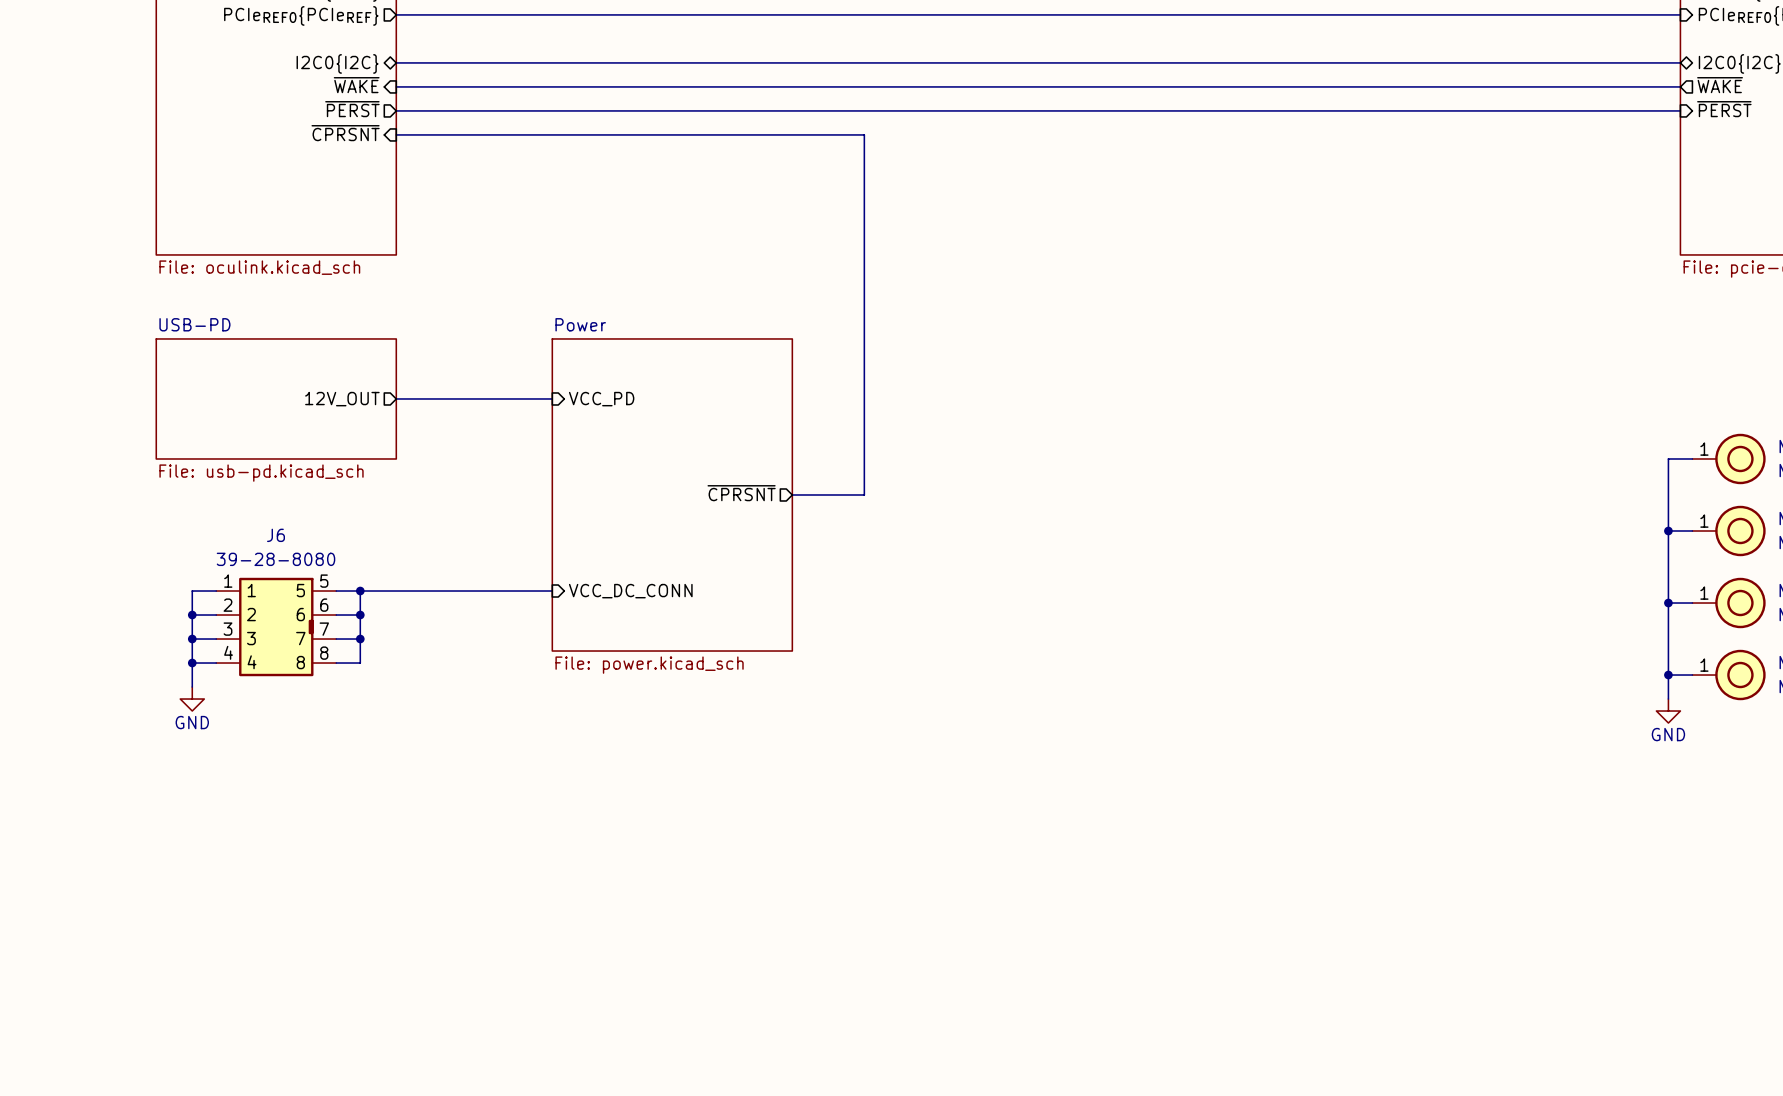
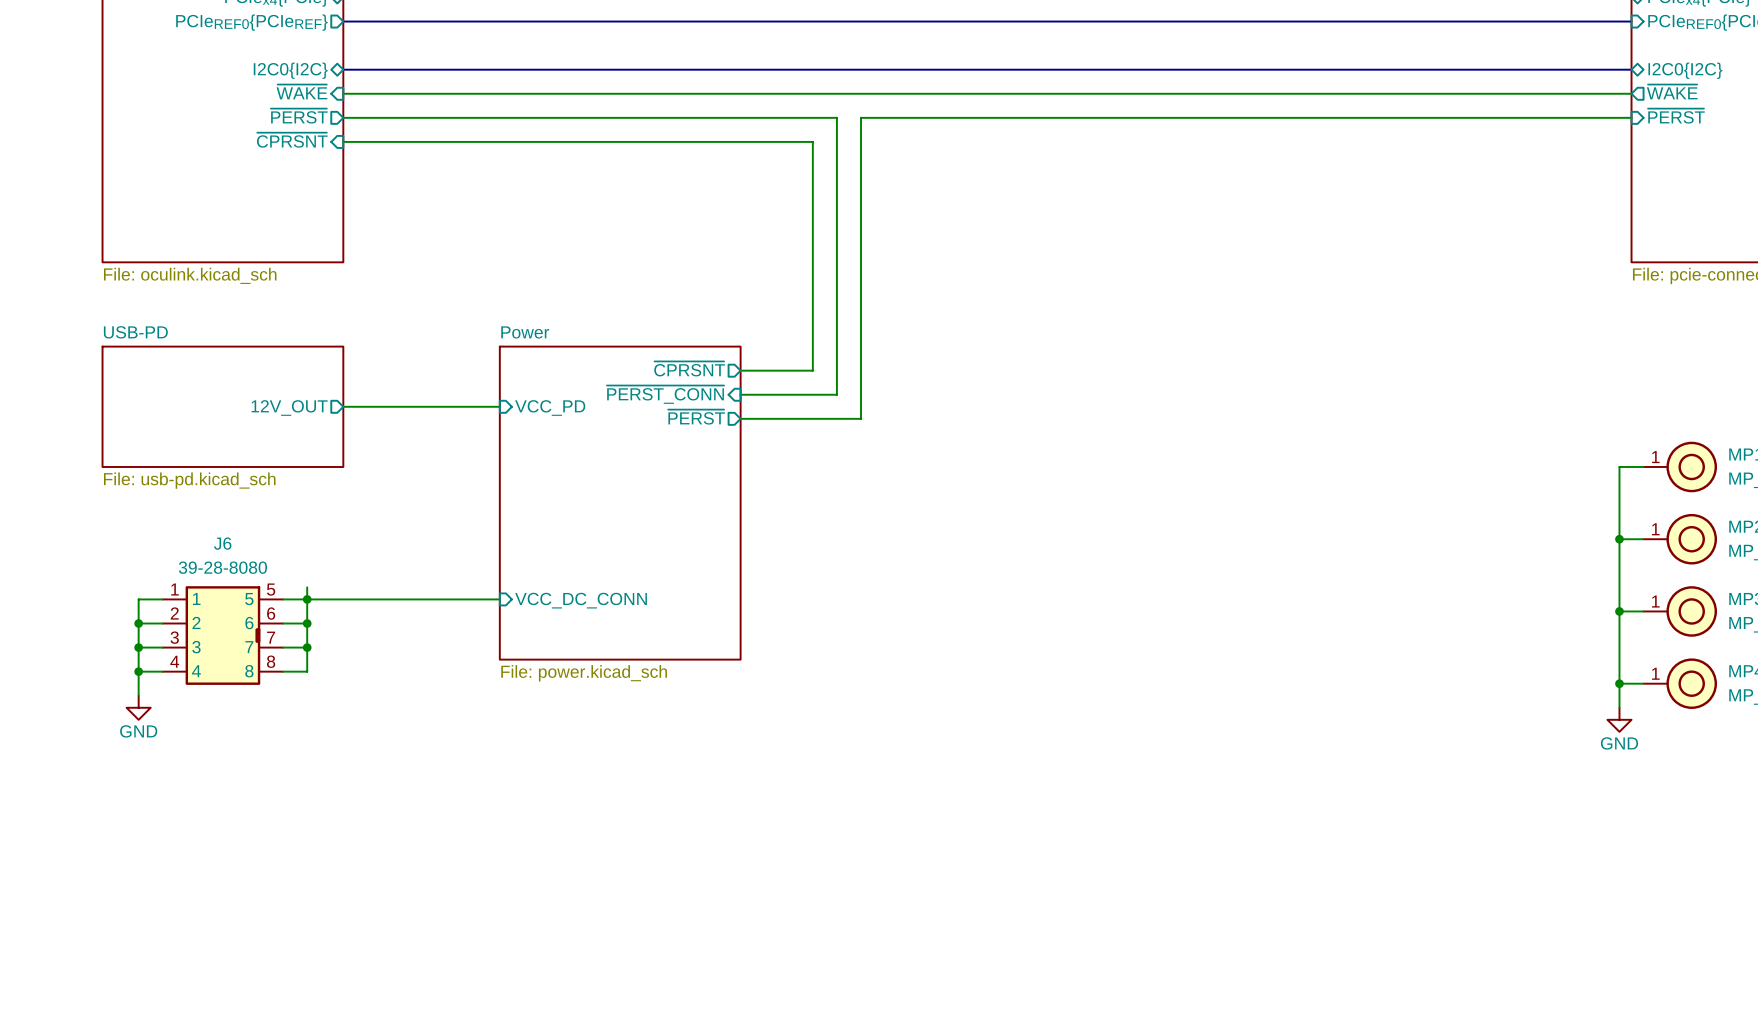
wire: (888, 110) (912, 110) -> (836, 117) (836, 394) (740, 394)
wire: none -> (861, 117) (861, 418) (740, 418)
wire: (864, 362) (864, 494) (792, 494) -> (812, 370) (740, 370)
sheet pin: none -> ~{PERST_CONN} (665, 394)
sheet pin: none -> ~{PERST} (696, 417)
sheet pin position: ~{CPRSNT} (741, 493) -> ~{CPRSNT} (689, 368)
wire: none -> (307, 587) (307, 599)

